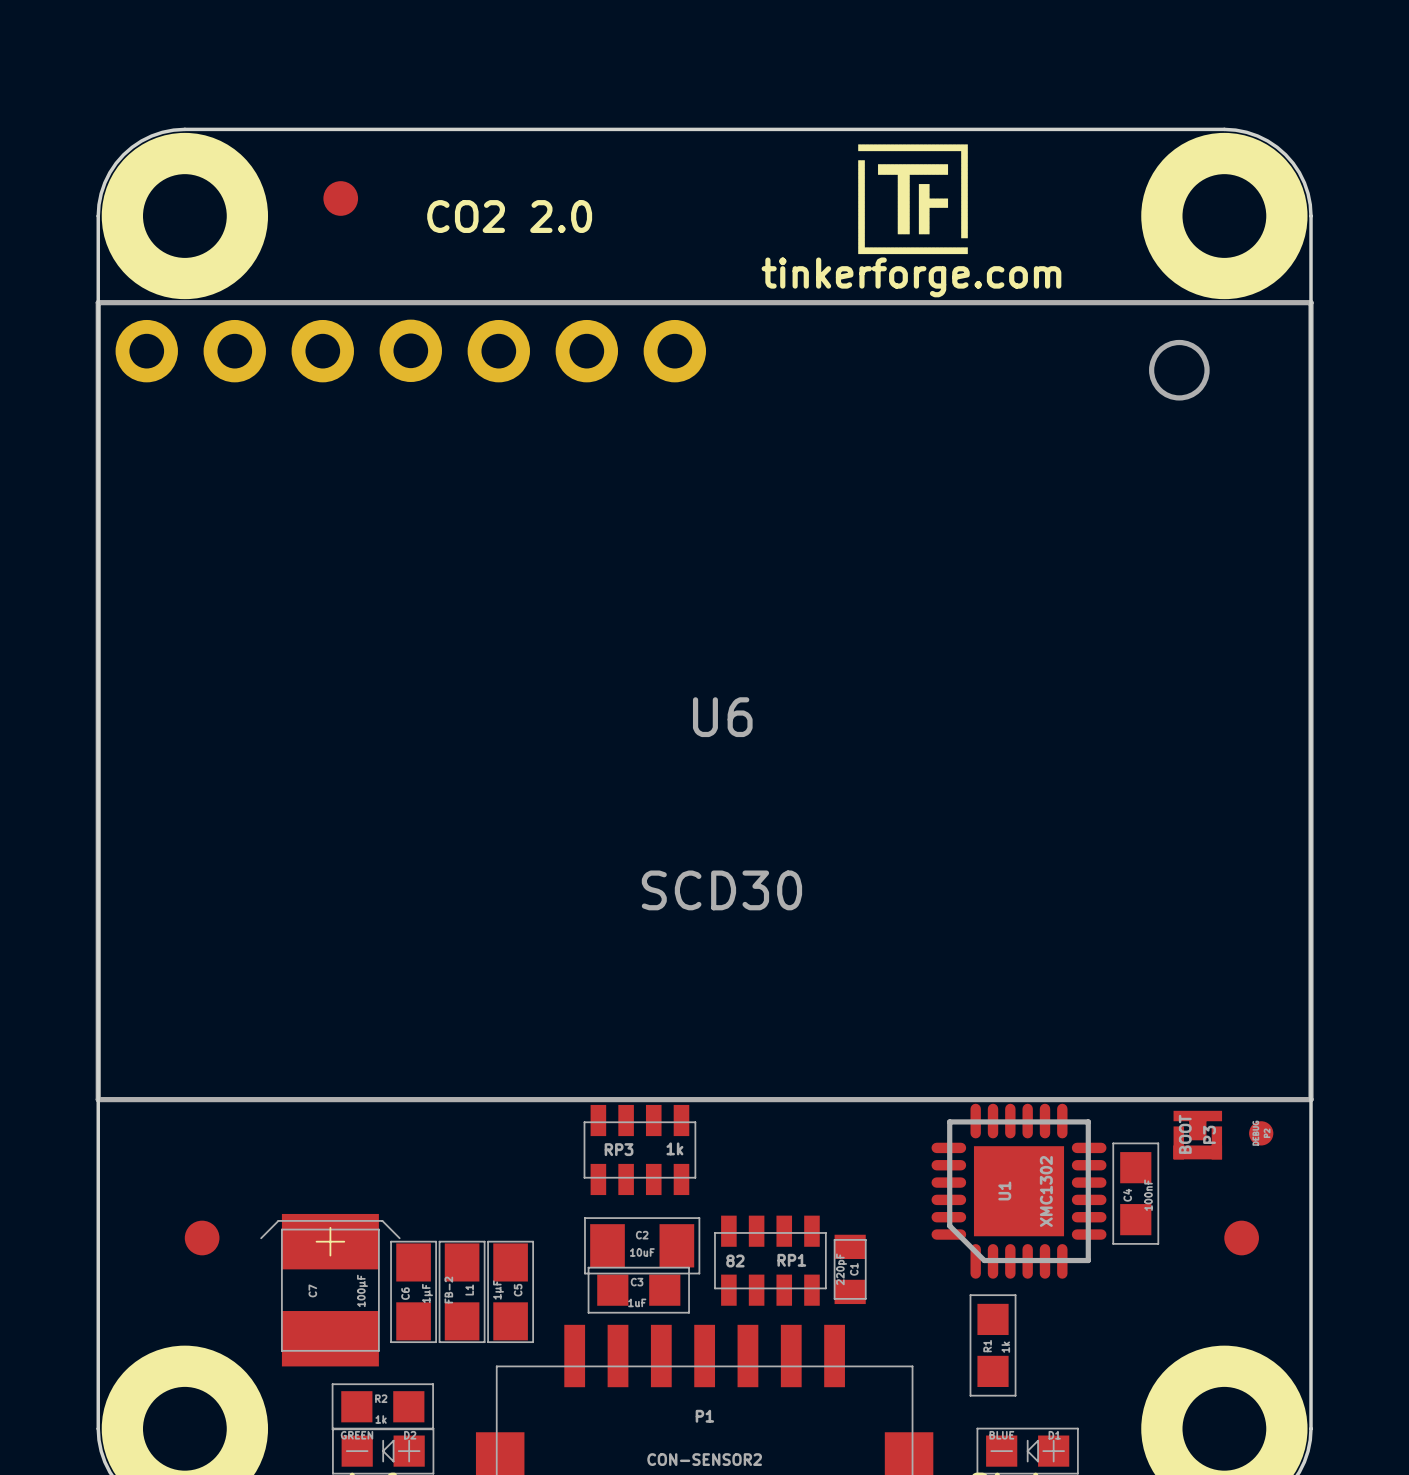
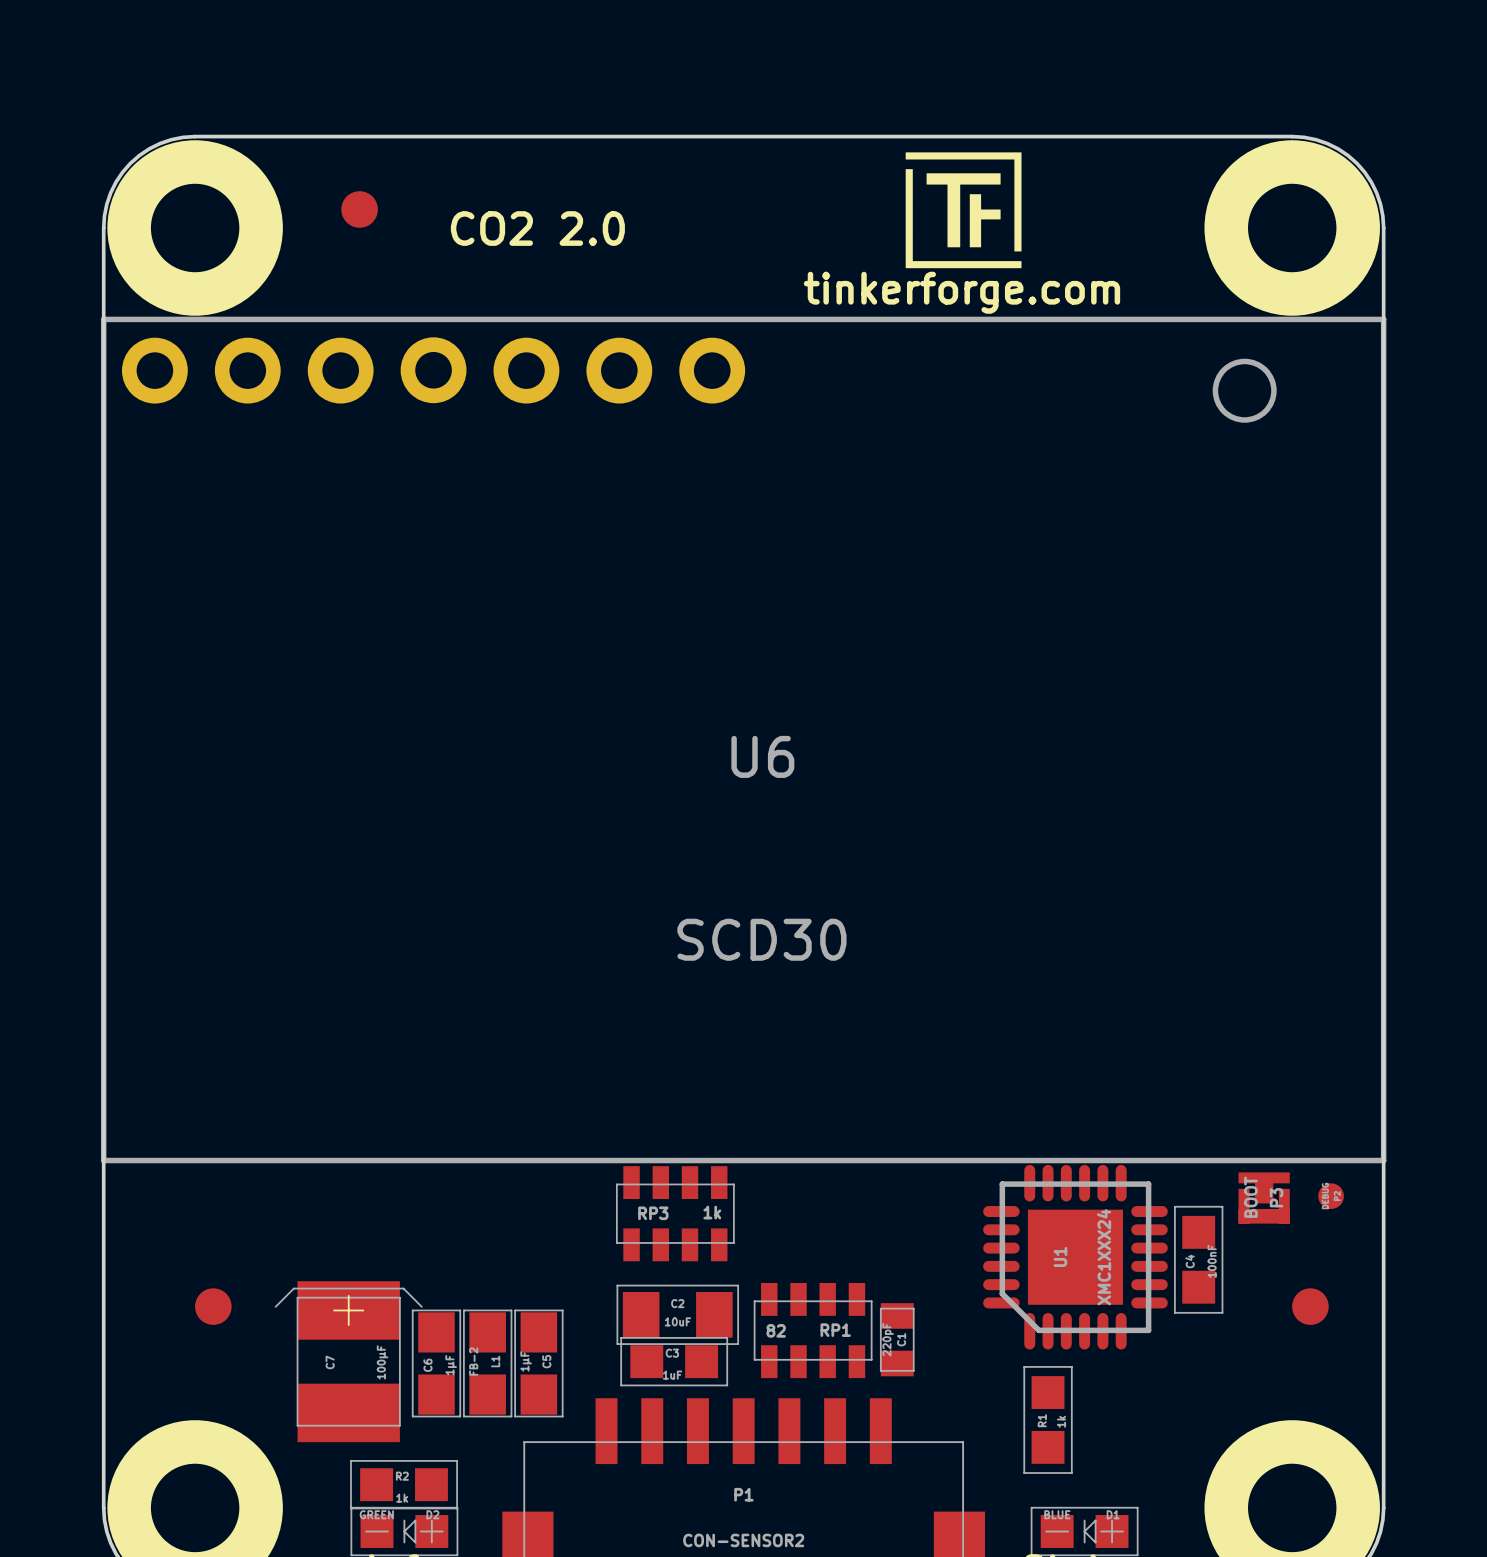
U1 value: XMC1302 (1046, 1191) -> XMC1XXX24 (1104, 1257)

